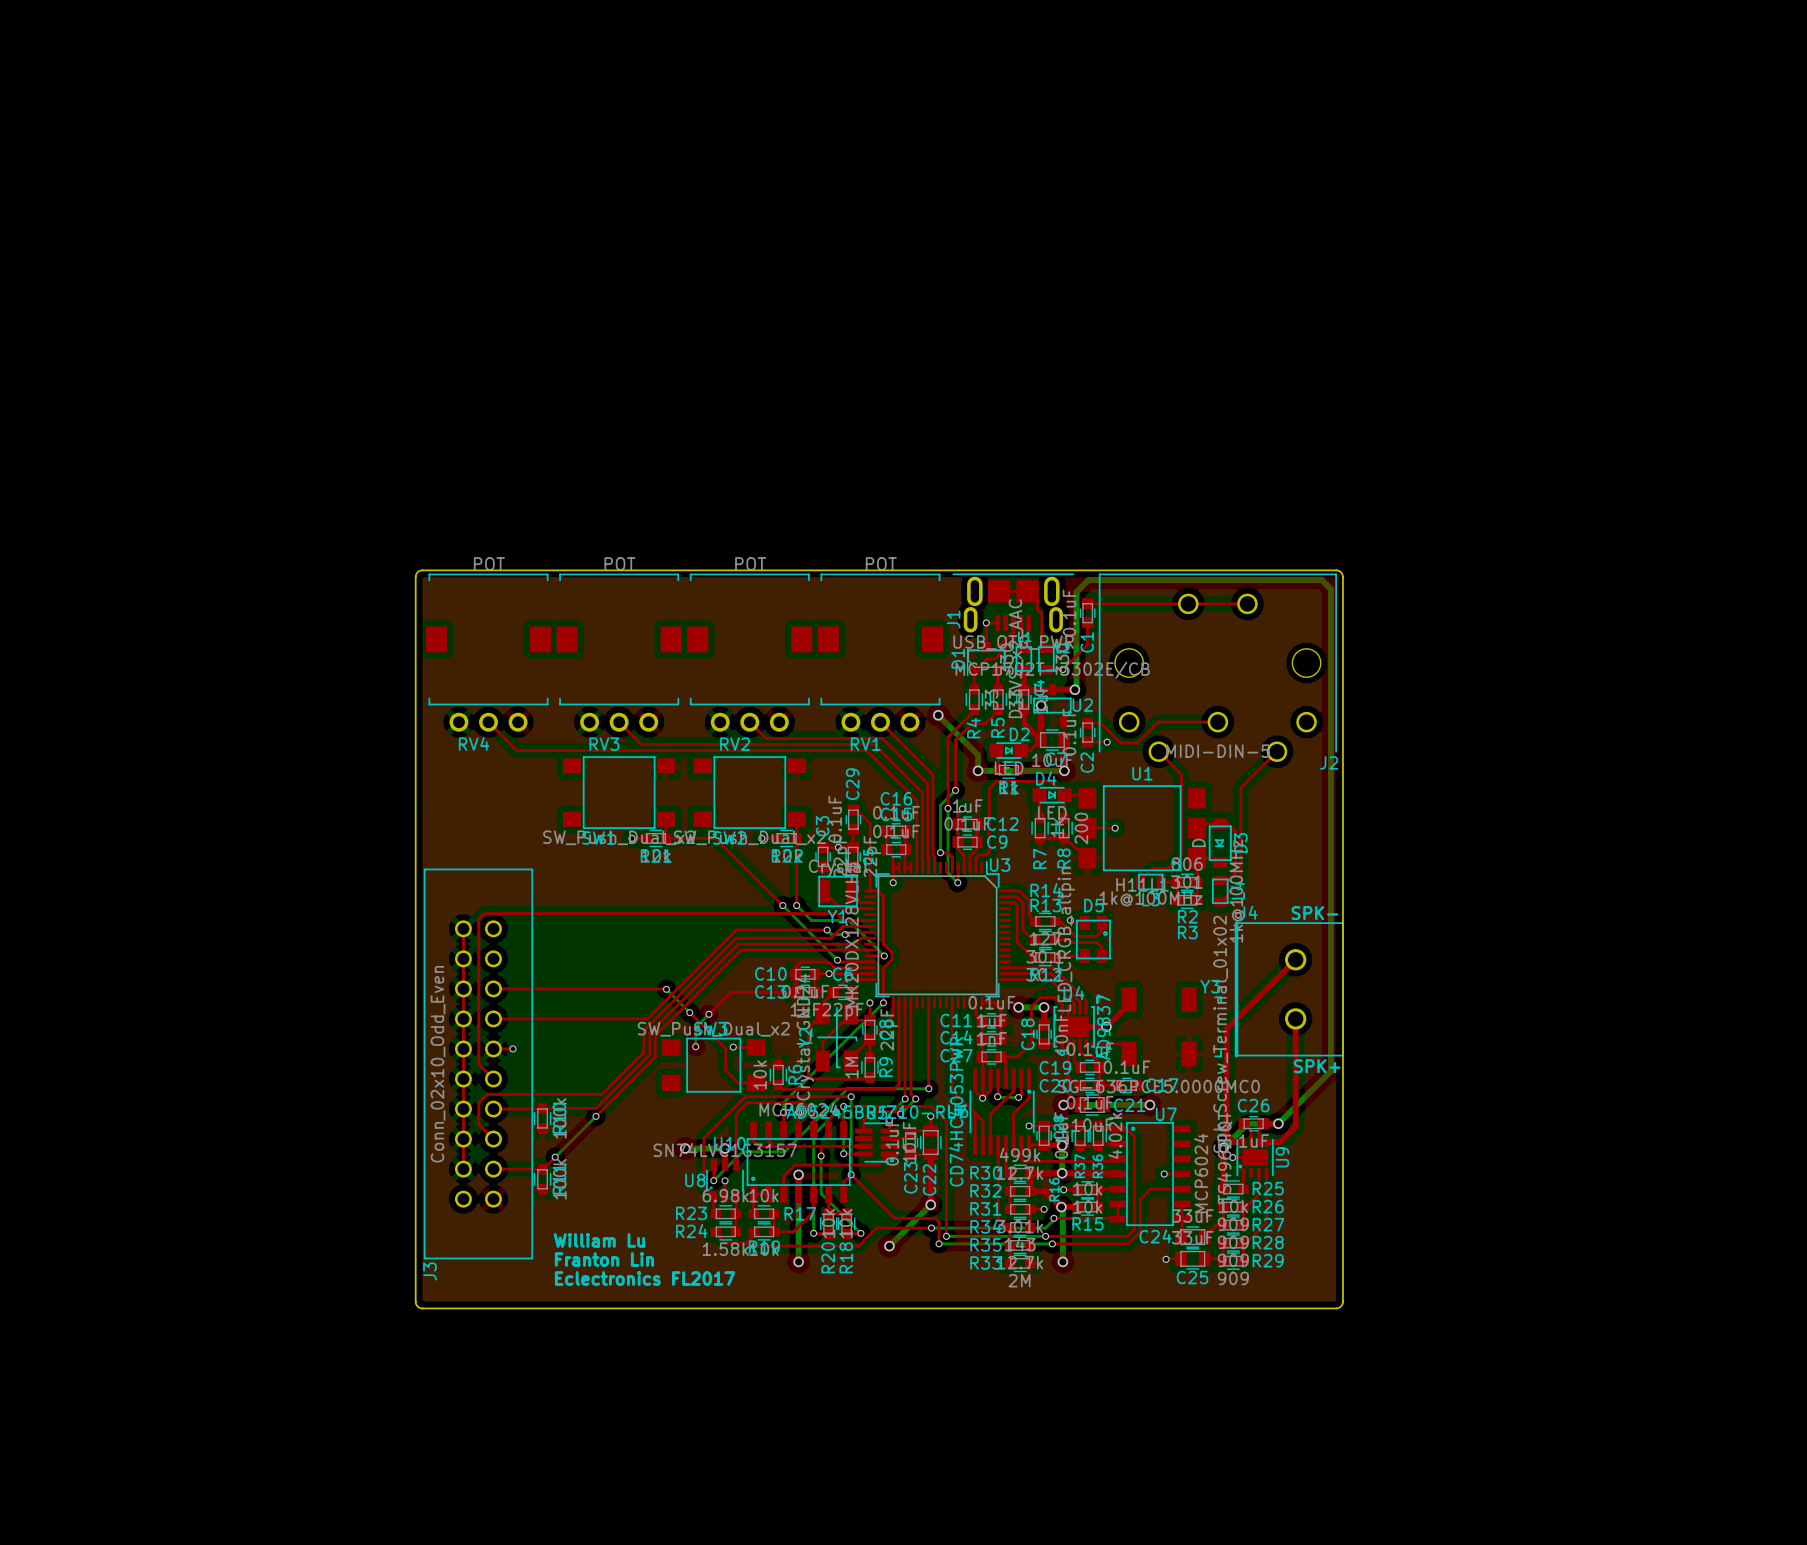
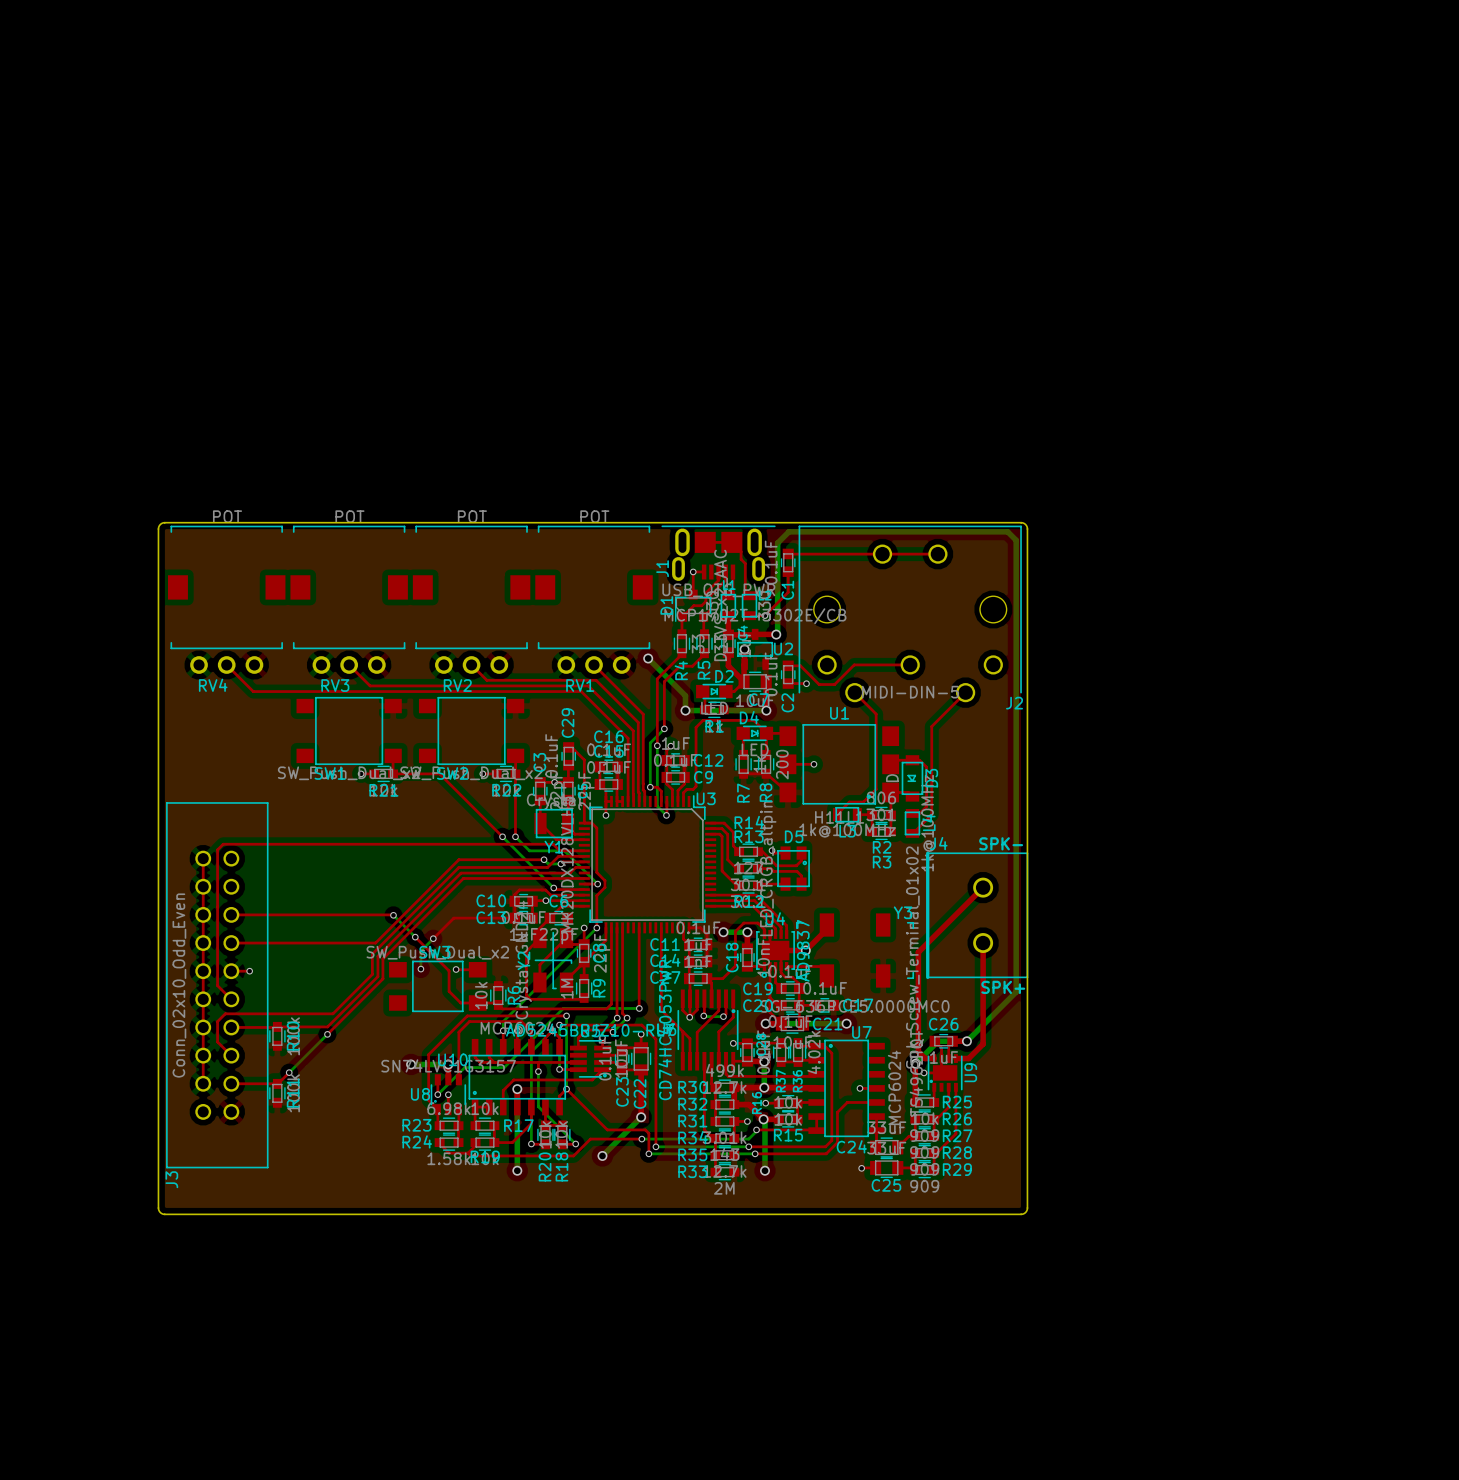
text: William Lu (599, 1240) -> none
text: Franton Lin (604, 1259) -> none
text: Eclectronics FL2017 (645, 1278) -> none

